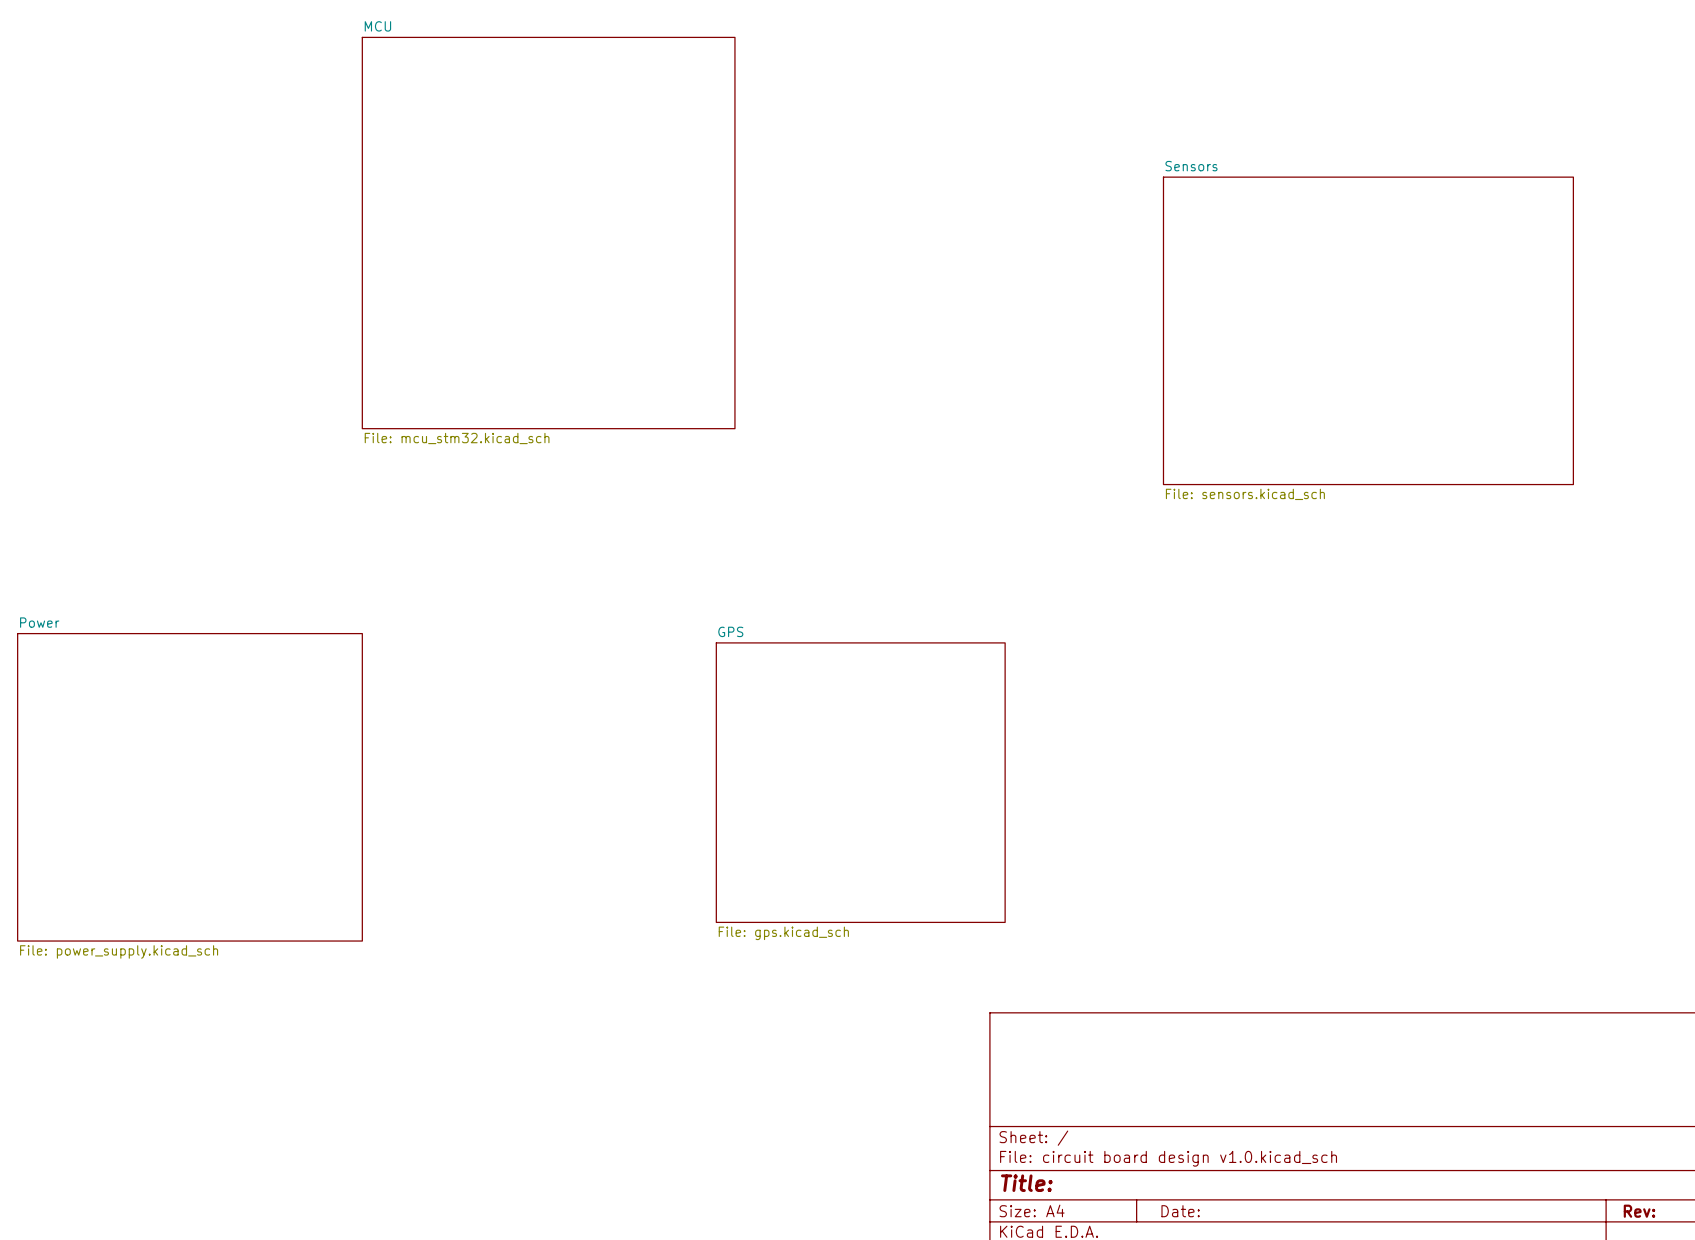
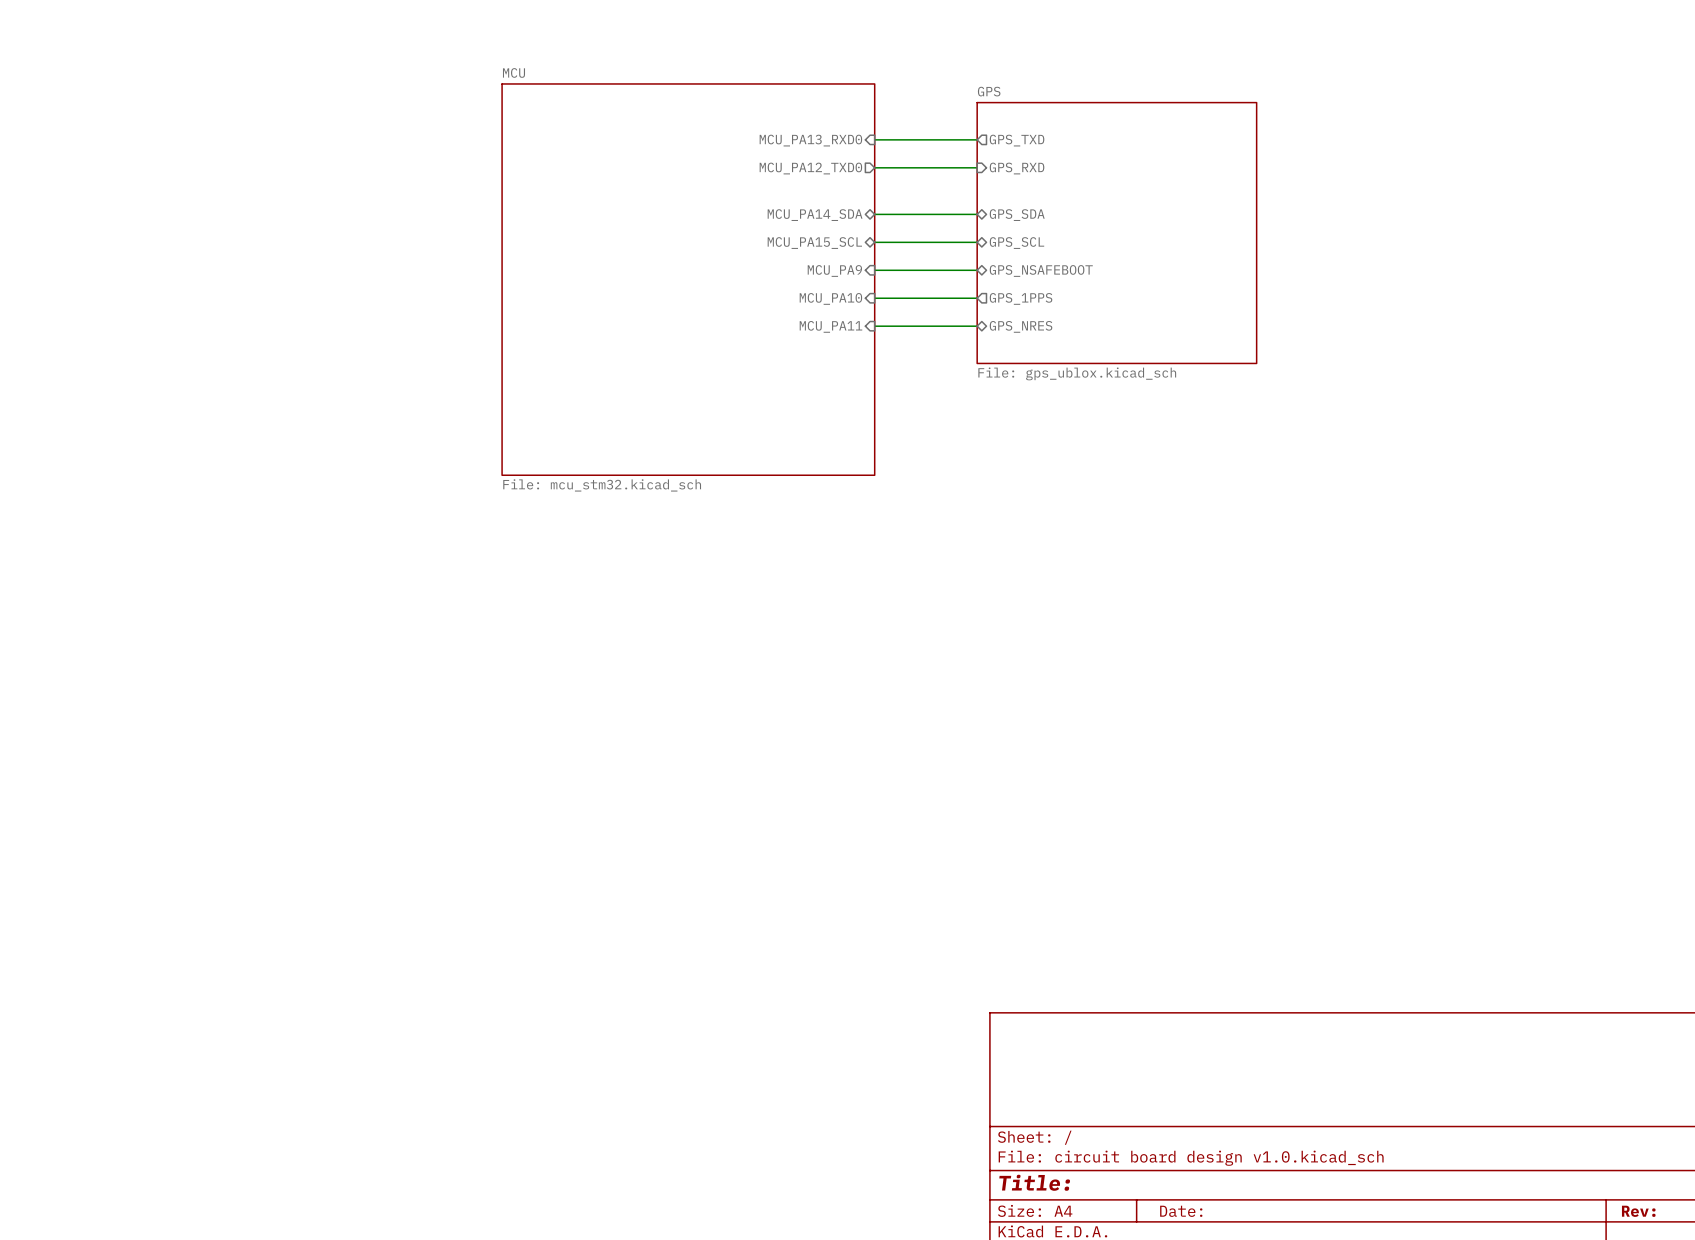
sheet pin: none -> MCU_PA13_RXD0 (810, 140)
wire: none -> (874, 139) (977, 139)
sheet pin: none -> GPS_TXD (1017, 140)
sheet pin: none -> MCU_PA12_TXD0 (810, 168)
wire: none -> (874, 167) (977, 167)
sheet pin: none -> GPS_RXD (1017, 168)
sheet pin: none -> MCU_PA14_SDA (815, 215)
wire: none -> (874, 214) (977, 214)
sheet pin: none -> GPS_SDA (1017, 215)
sheet MCU position: (548, 233) -> (688, 279)
sheet GPS: none -> File: gps_ublox.kicad_sch (1116, 233)
sheet pin: none -> MCU_PA15_SCL (814, 243)
wire: none -> (874, 242) (977, 242)
sheet pin: none -> GPS_SCL (1016, 243)
sheet pin: none -> MCU_PA9 (834, 270)
wire: none -> (874, 270) (977, 270)
sheet pin: none -> GPS_NSAFEBOOT (1041, 270)
sheet pin: none -> MCU_PA10 (830, 298)
wire: none -> (874, 298) (977, 298)
sheet pin: none -> GPS_1PPS (1021, 298)
sheet pin: none -> MCU_PA11 (830, 326)
wire: none -> (874, 326) (977, 326)
sheet pin: none -> GPS_NRES (1021, 326)
sheet Sensors: File: sensors.kicad_sch (1368, 330) -> none
sheet GPS: File: gps.kicad_sch (860, 782) -> none
sheet Power: File: power_supply.kicad_sch (189, 787) -> none

